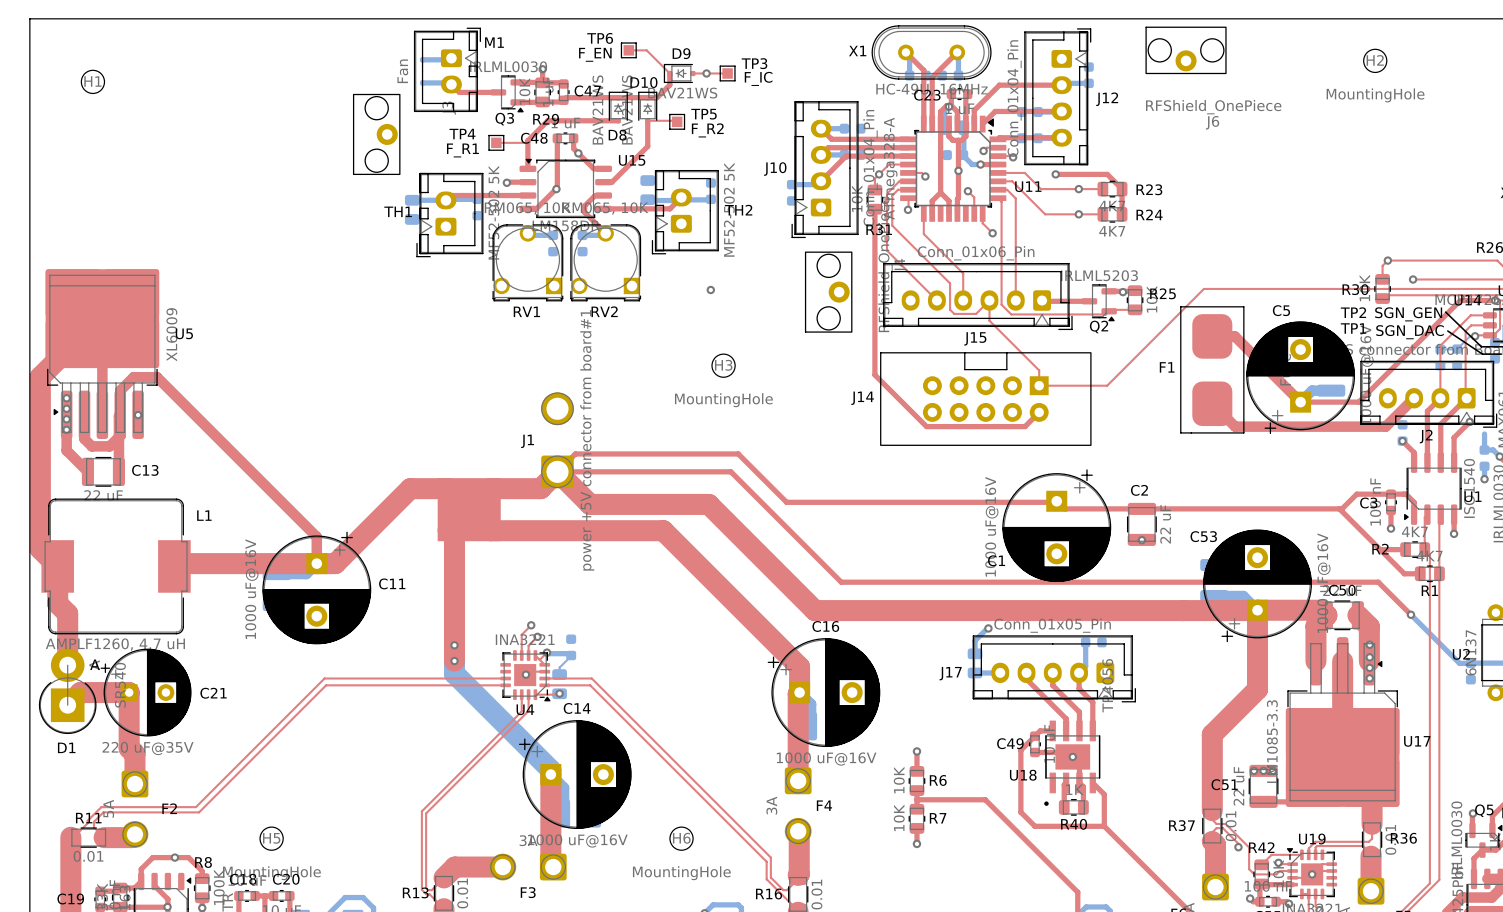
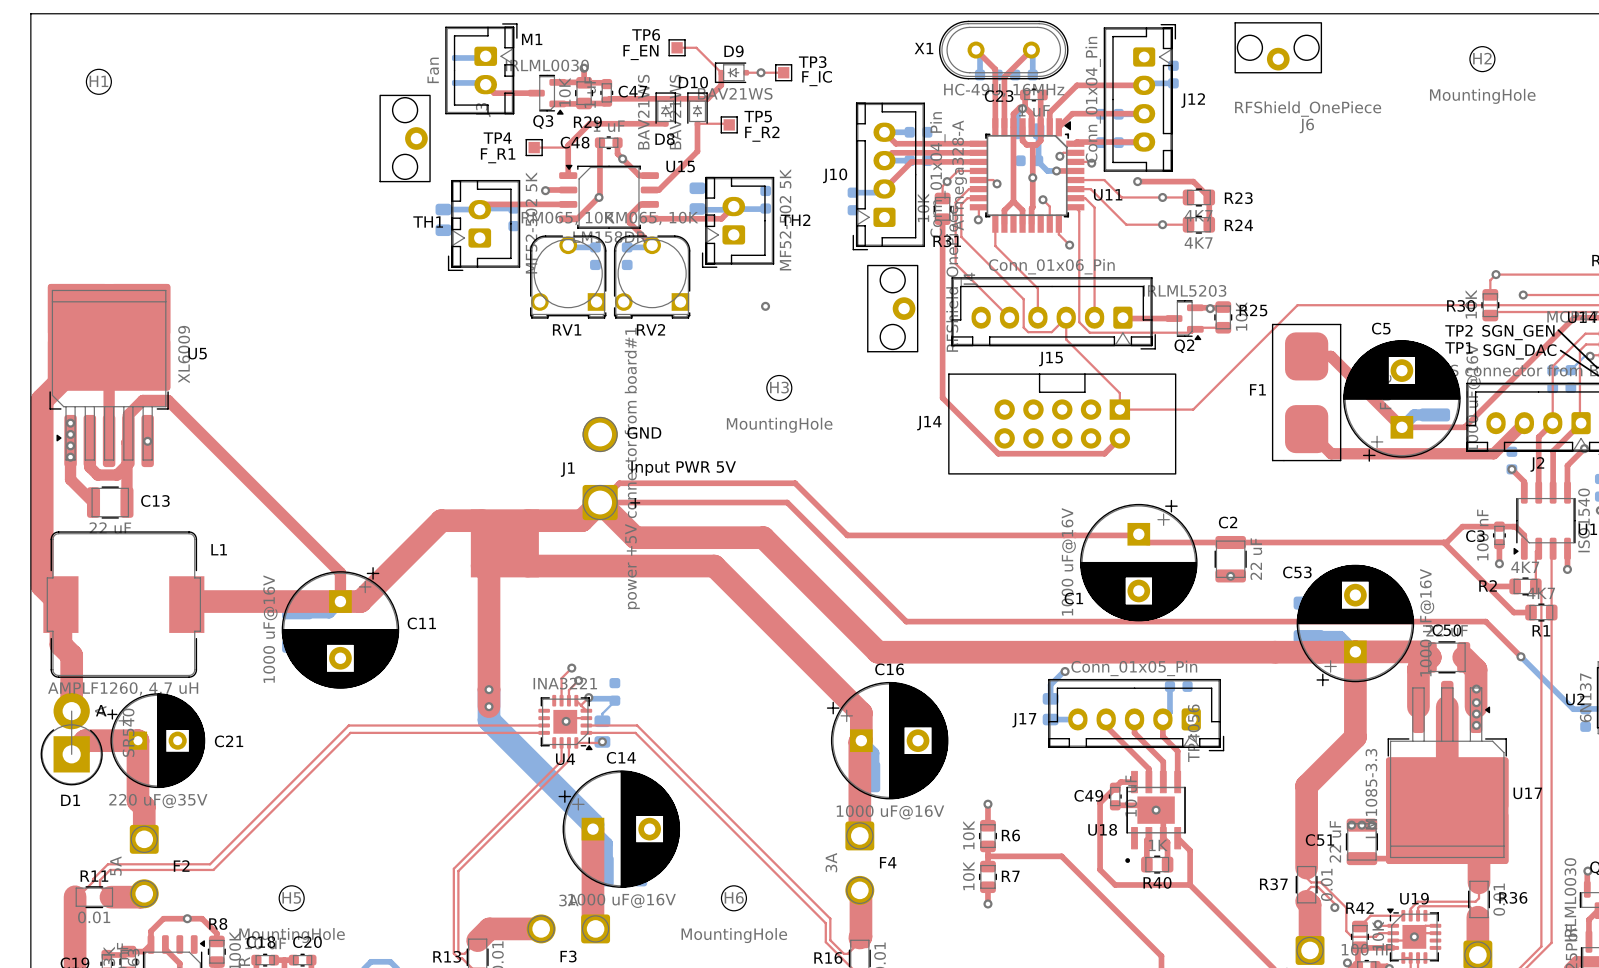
J1 text: none -> GND (644, 432)
J1 text: none -> Input PWR 5V (683, 468)
J1 text: none -> + (635, 502)

